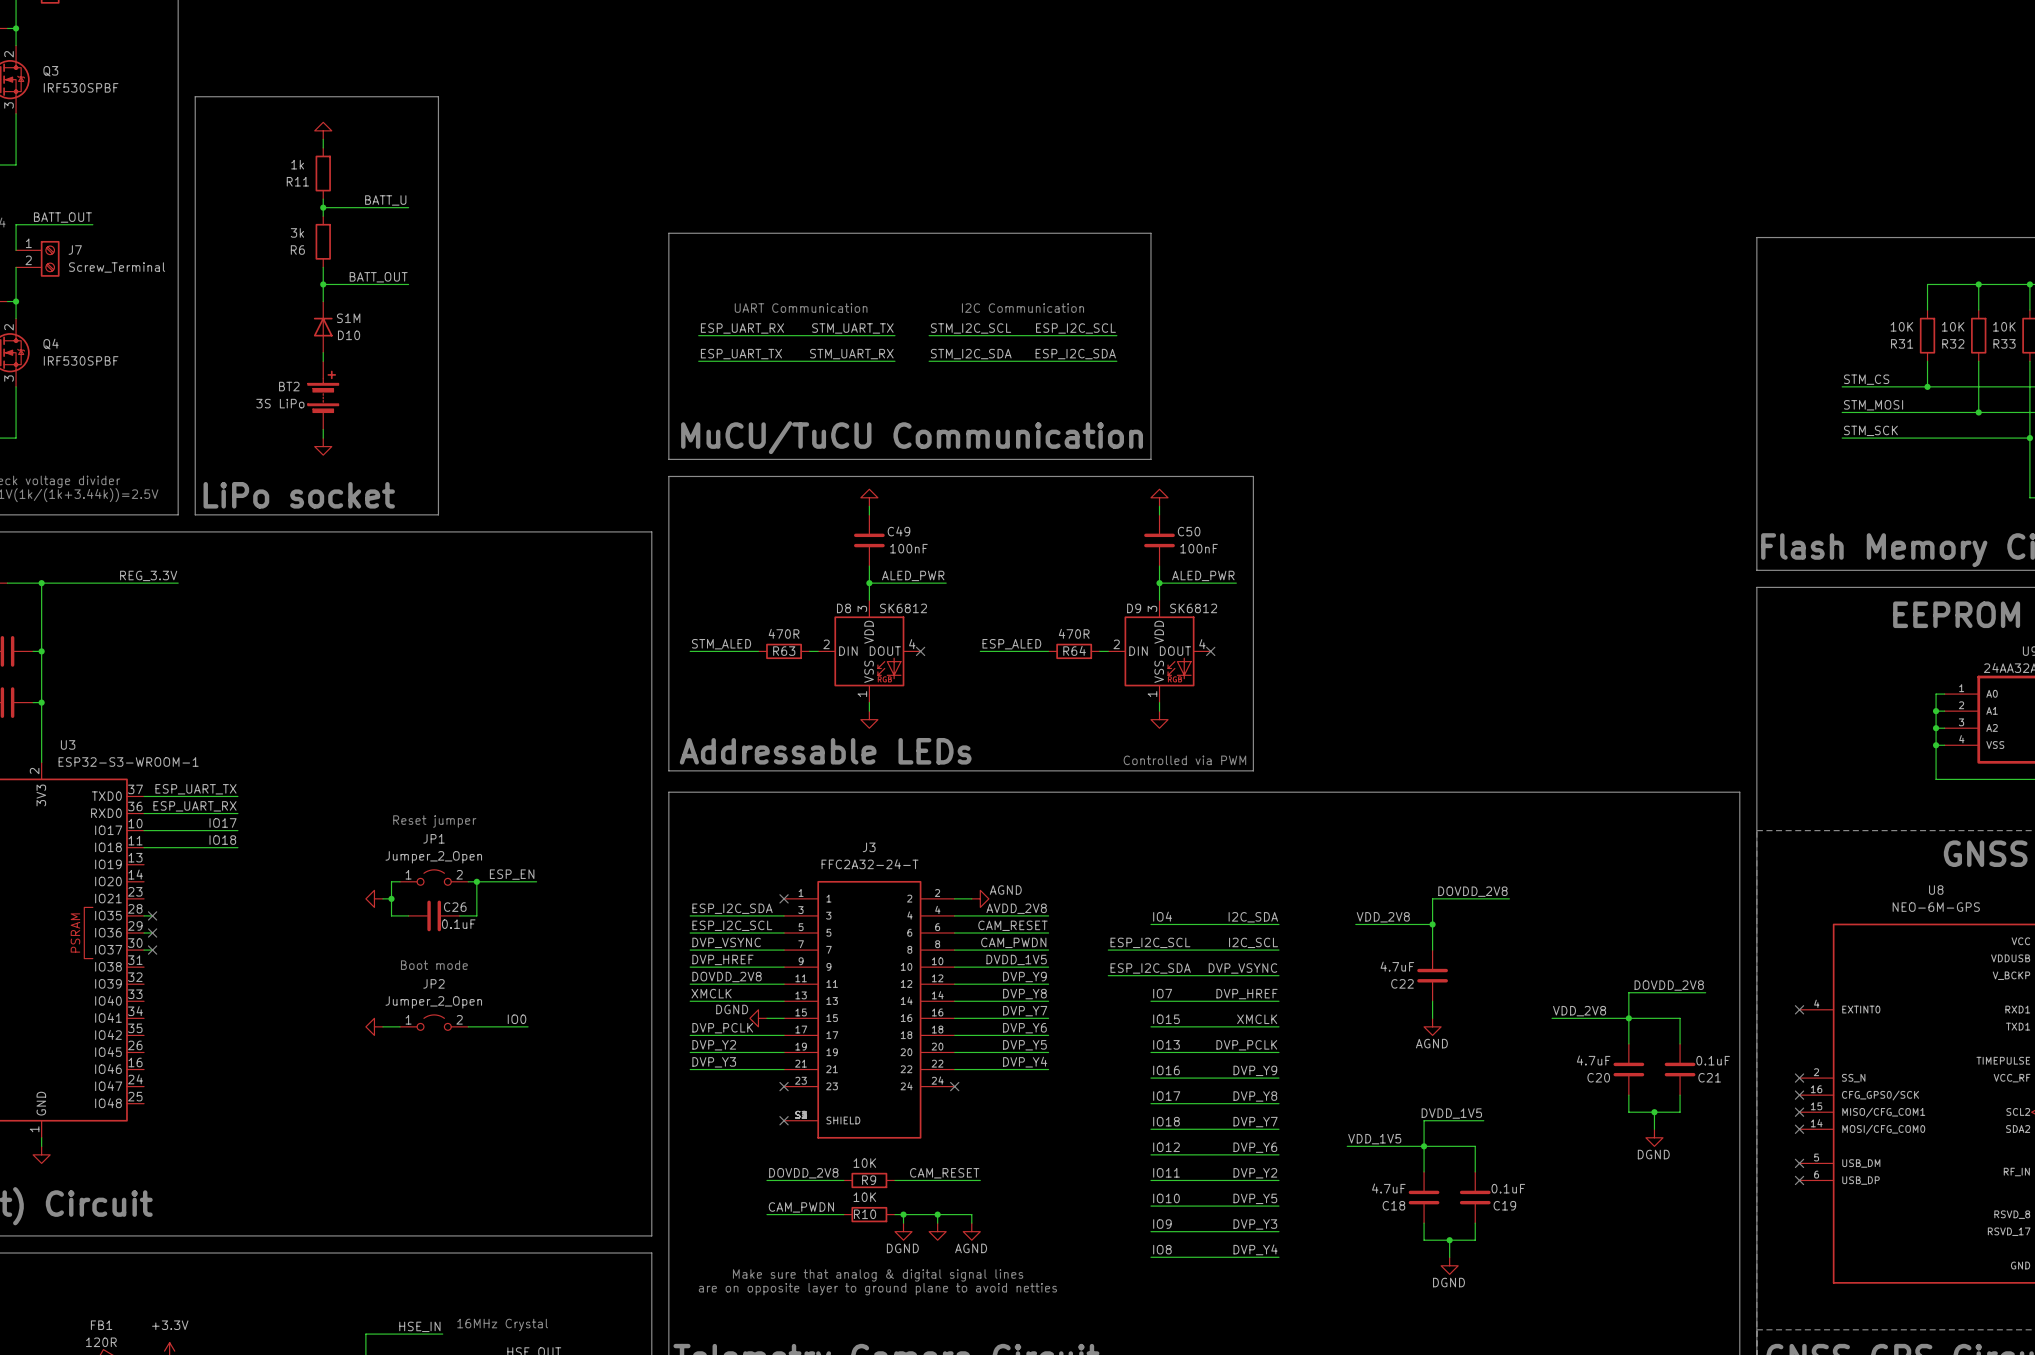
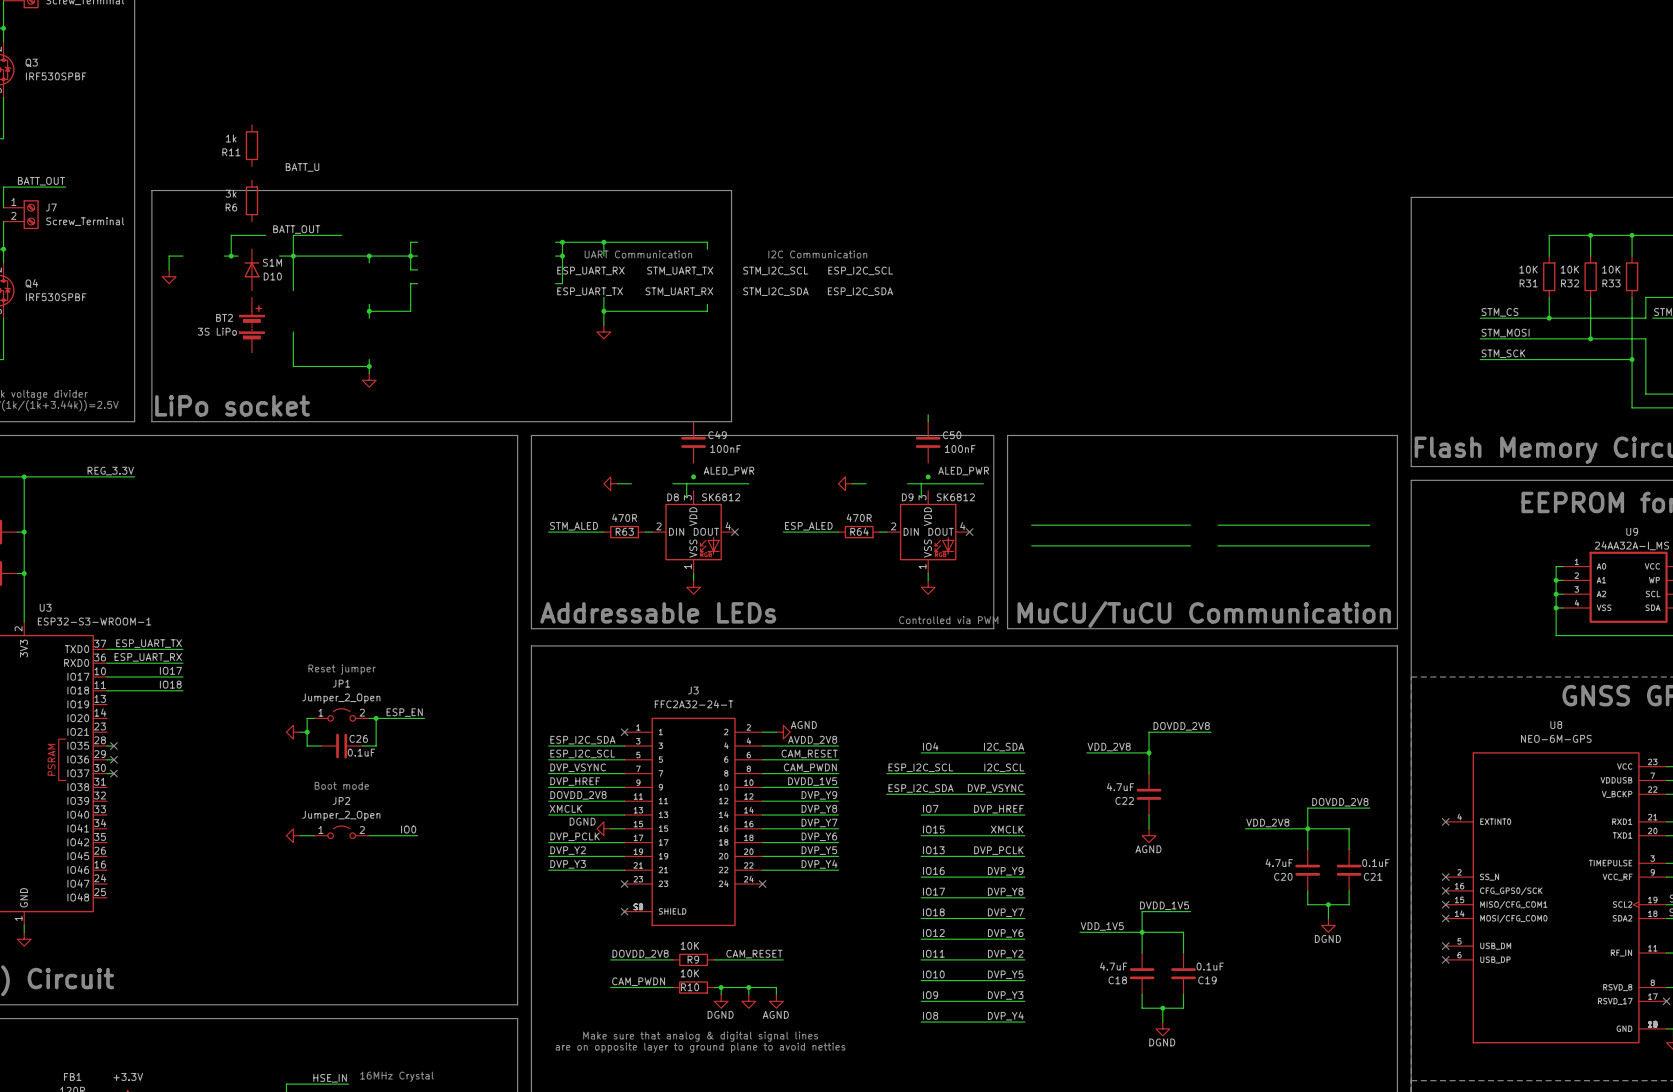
power symbol: (323, 130) -> none
wire: (323, 139) (323, 147) -> none
wire: (323, 199) (323, 216) -> none
wire: (323, 207) (408, 207) -> none
junction: (323, 207) -> none
line: (668, 233) (1150, 233) (1150, 459) (668, 459) (668, 233) -> none
wire: (323, 267) (323, 301) -> none
wire: none -> (251, 235) (231, 235) (231, 256)
junction: (323, 284) -> none
wire: (340, 284) (374, 284) -> (293, 290) (293, 235)
wire: none -> (320, 235) (341, 235)
wire: none -> (417, 242) (410, 242) (410, 269) (417, 269)
wire: none -> (555, 242) (707, 242) (707, 249)
wire: none -> (562, 242) (562, 283) (555, 283)
junction: none -> (562, 242)
wire: none -> (603, 242) (603, 256)
junction: none -> (603, 242)
wire: none -> (182, 256) (169, 256) (169, 269)
wire: none -> (224, 256) (238, 256)
junction: none -> (231, 256)
wire: none -> (279, 256) (417, 256)
junction: none -> (293, 256)
junction: none -> (369, 256)
junction: none -> (410, 256)
wire: none -> (555, 256) (562, 256)
junction: none -> (562, 256)
power symbol: none -> (169, 276)
wire: (698, 335) (894, 335) -> none
wire: (929, 335) (1116, 335) -> none
wire: none -> (417, 283) (410, 283) (410, 311) (369, 311)
wire: (323, 352) (323, 361) -> (369, 256) (369, 262)
wire: (698, 361) (894, 361) -> none
wire: none -> (603, 297) (603, 325)
wire: (929, 361) (1116, 361) -> none
wire: none -> (369, 304) (369, 318)
wire: none -> (707, 304) (707, 311) (603, 311)
junction: none -> (369, 311)
junction: none -> (603, 311)
wire: none -> (293, 331) (293, 366) (369, 366)
power symbol: none -> (603, 331)
wire: (323, 429) (323, 438) -> none
text: MuCU/TuCU Communication (912, 437) -> none
wire: none -> (369, 359) (369, 373)
power symbol: (323, 446) -> none
junction: none -> (369, 366)
power symbol: none -> (369, 380)
power symbol: (869, 497) -> none
power symbol: (1159, 497) -> none
wire: (869, 506) (869, 514) -> none
line: (199, 514) (195, 514) (195, 96) (438, 96) (438, 514) -> (151, 421) (151, 190) (731, 190) (731, 421) (345, 421)
line: (668, 531) (668, 476) (1253, 476) (1253, 770) (1240, 770) -> (531, 435) (993, 435) (993, 628)
line: none -> (1007, 435) (1397, 435) (1397, 628) (1007, 628) (1007, 435)
wire: (869, 566) (869, 600) -> none
wire: (1159, 566) (1159, 600) -> none
wire: (869, 583) (946, 583) -> none
wire: (1159, 583) (1236, 583) -> none
power symbol: none -> (610, 483)
wire: none -> (617, 483) (631, 483)
wire: none -> (672, 483) (748, 483)
wire: none -> (686, 483) (686, 497)
power symbol: none -> (845, 483)
wire: none -> (852, 483) (866, 483)
wire: none -> (907, 483) (983, 483)
wire: none -> (921, 483) (921, 497)
wire: none -> (1031, 525) (1190, 525)
wire: none -> (1218, 525) (1369, 525)
wire: none -> (1031, 545) (1190, 545)
wire: none -> (1218, 545) (1369, 545)
text: none -> MuCU/TuCU Communication (1204, 614)

